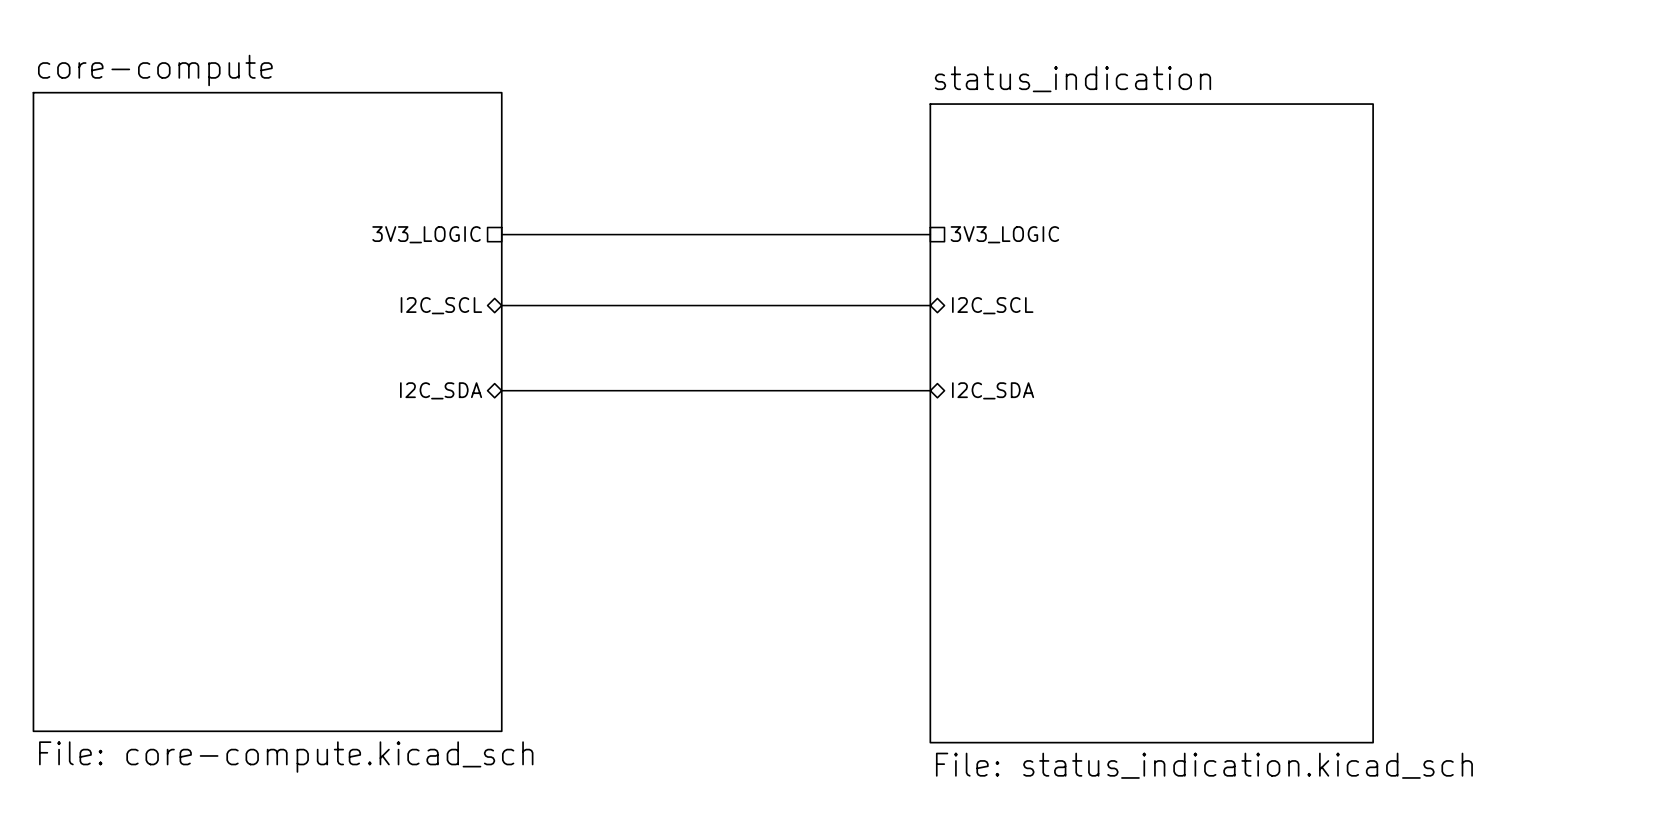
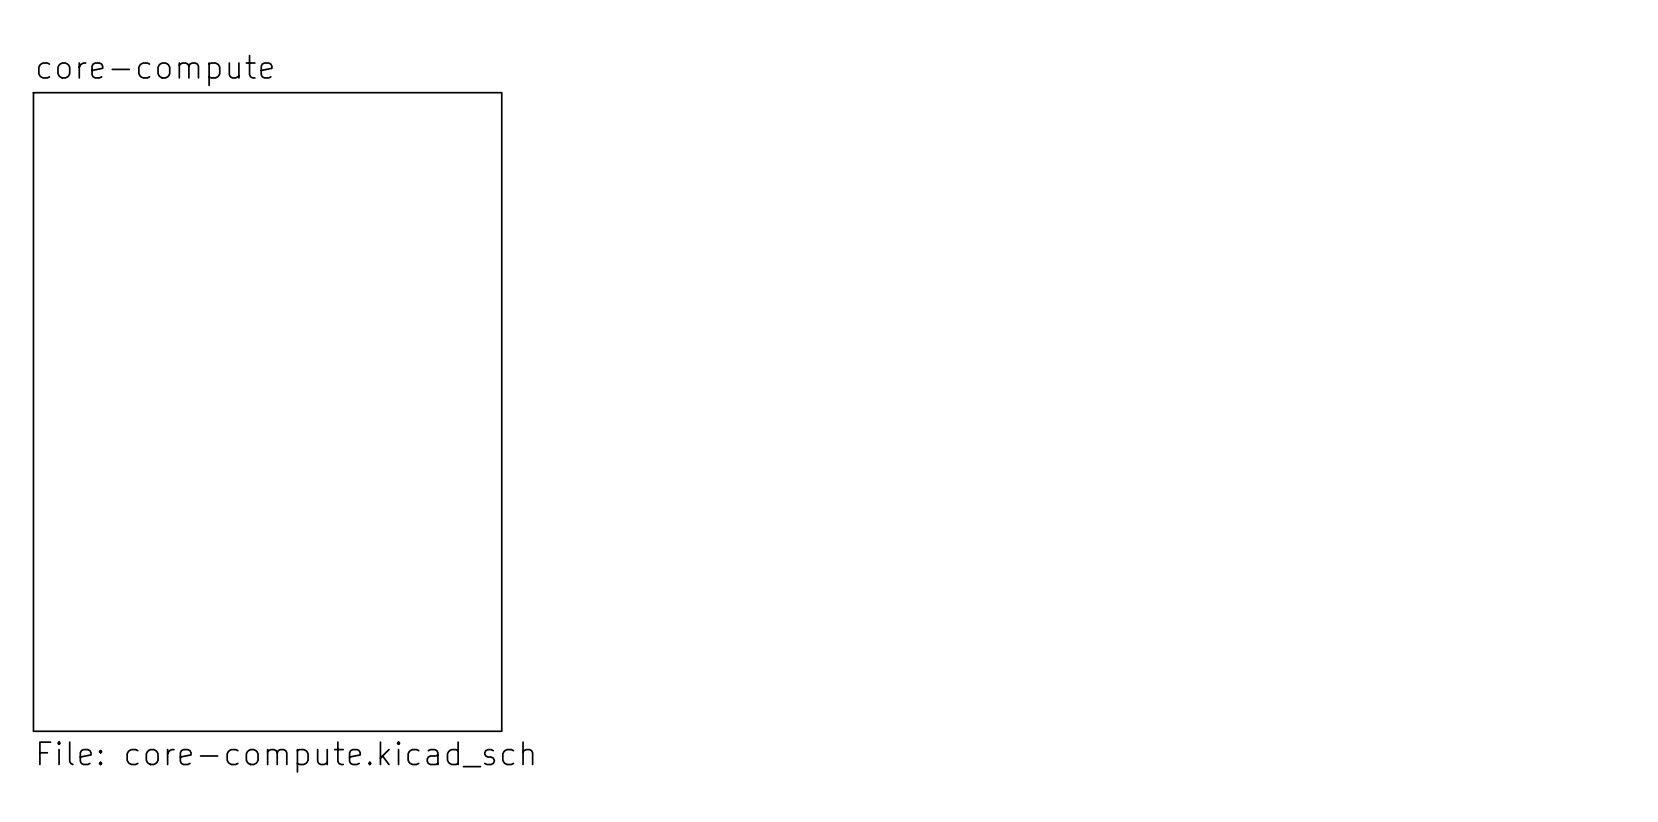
sheet pin: 3V3_LOGIC (426, 234) -> none
wire: (501, 234) (930, 234) -> none
sheet pin: 3V3_LOGIC (1004, 234) -> none
sheet pin: I2C_SCL (441, 305) -> none
wire: (501, 305) (930, 305) -> none
sheet pin: I2C_SCL (992, 305) -> none
sheet pin: I2C_SDA (441, 390) -> none
wire: (501, 390) (930, 390) -> none
sheet pin: I2C_SDA (993, 390) -> none
sheet status_indication: File: status_indication.kicad_sch (1151, 423) -> none

